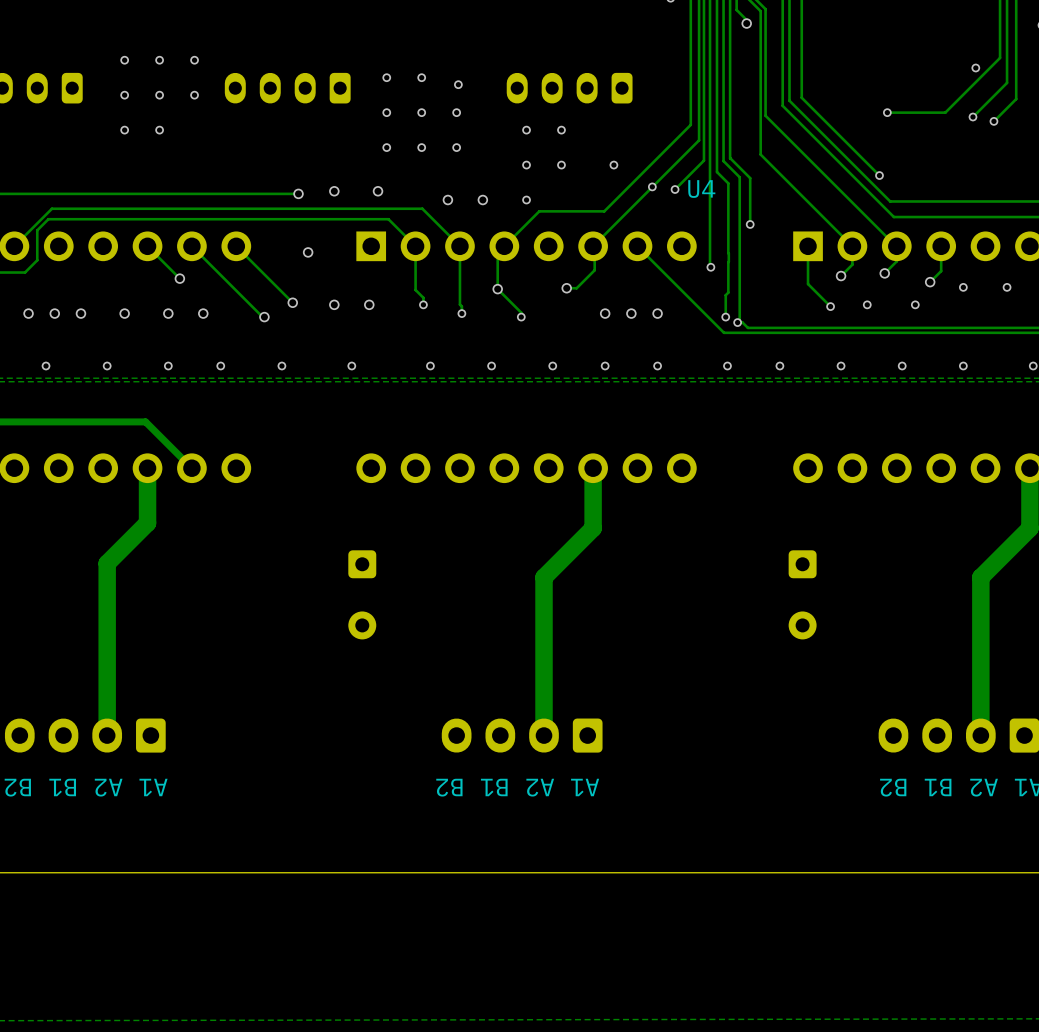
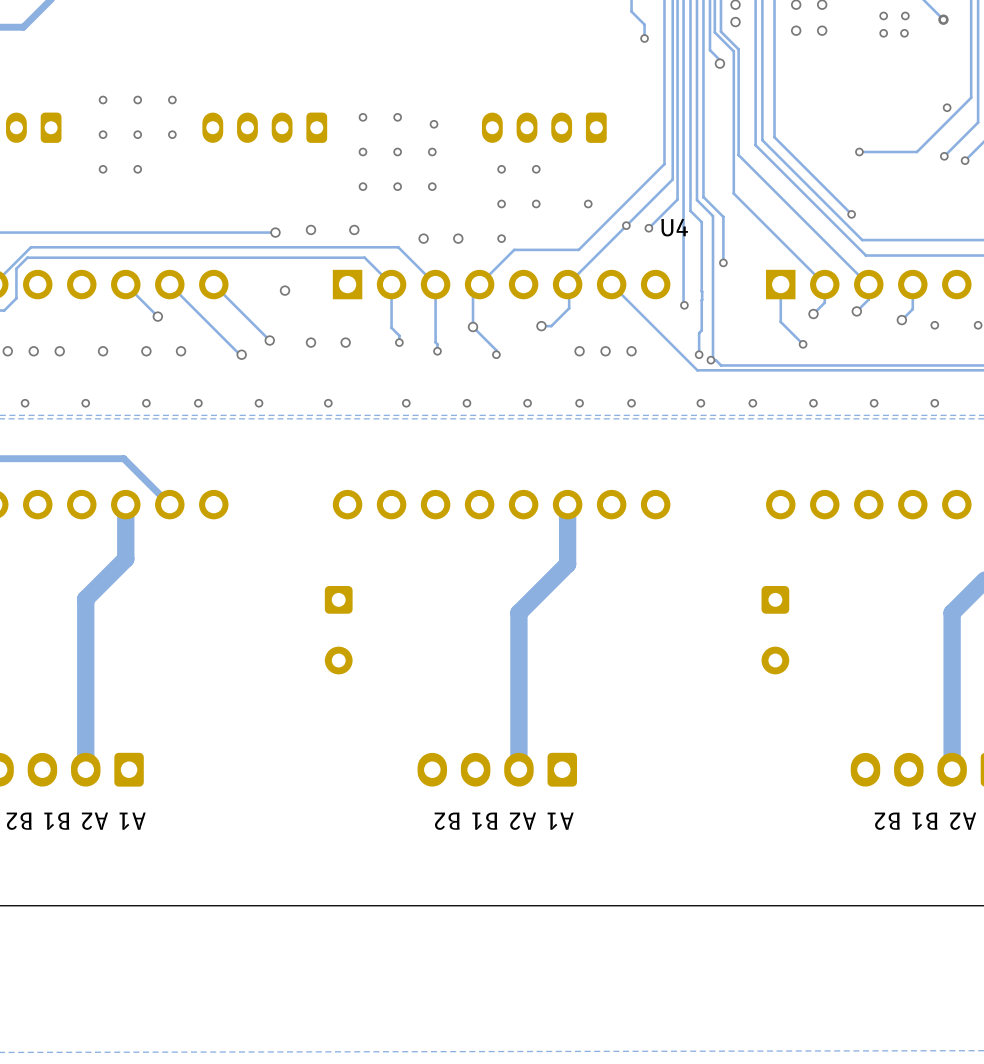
via: (867, 304) -> none
via: (915, 304) -> none

